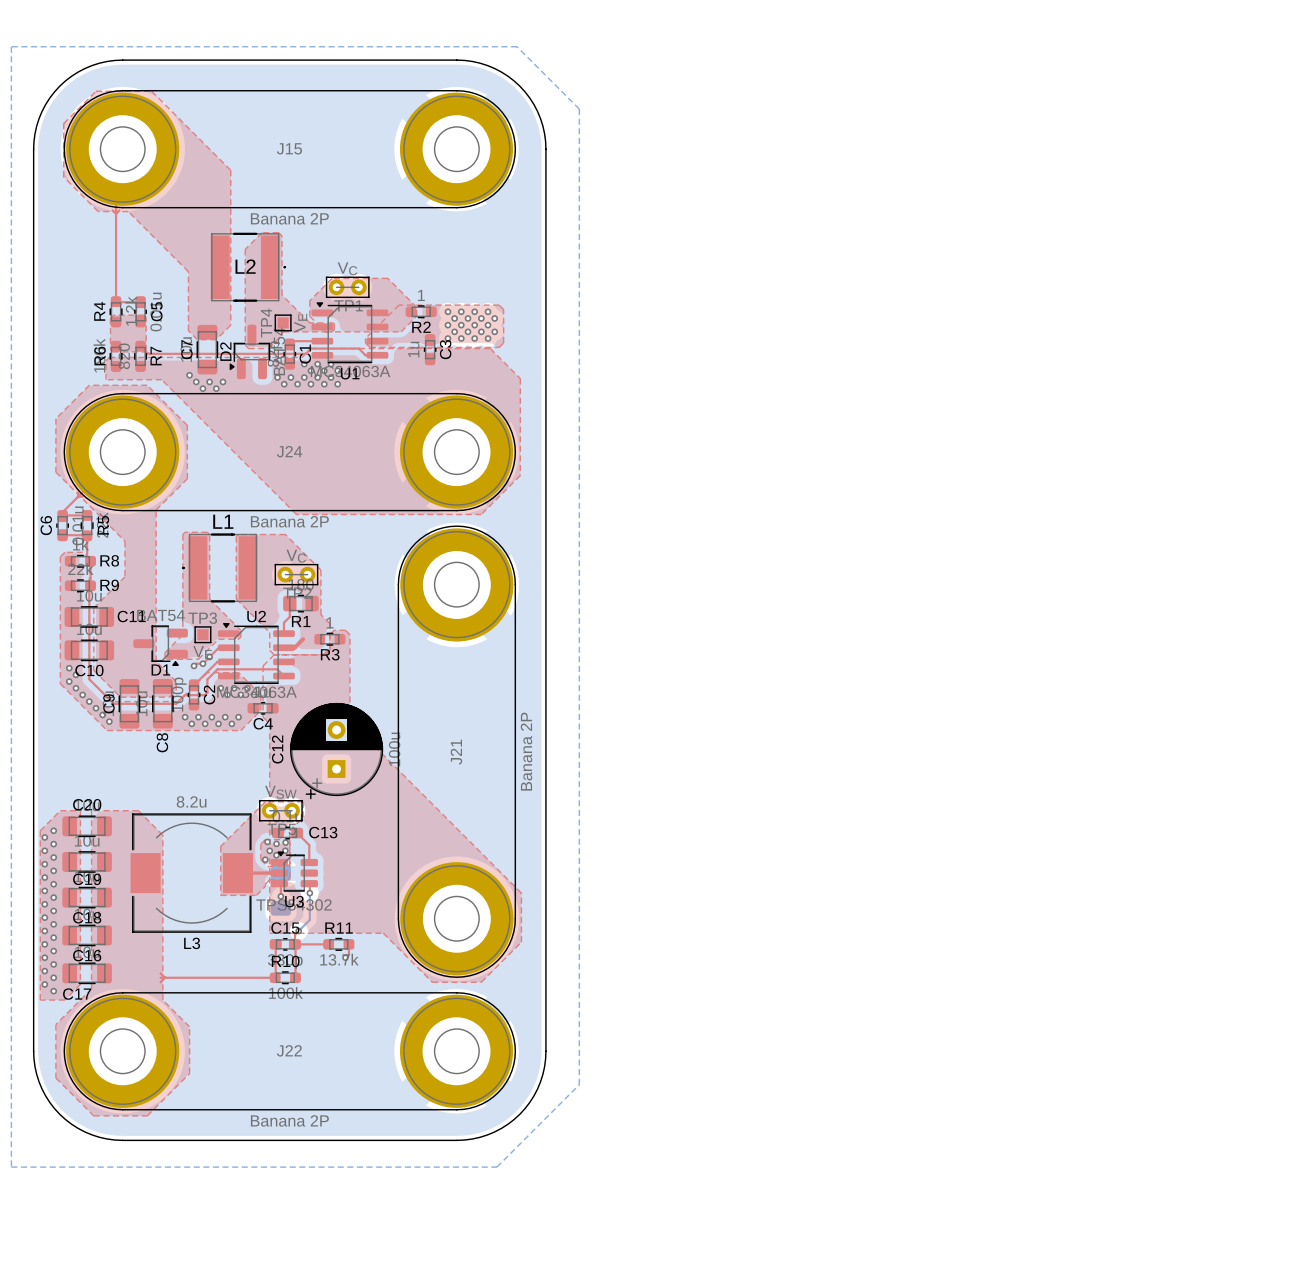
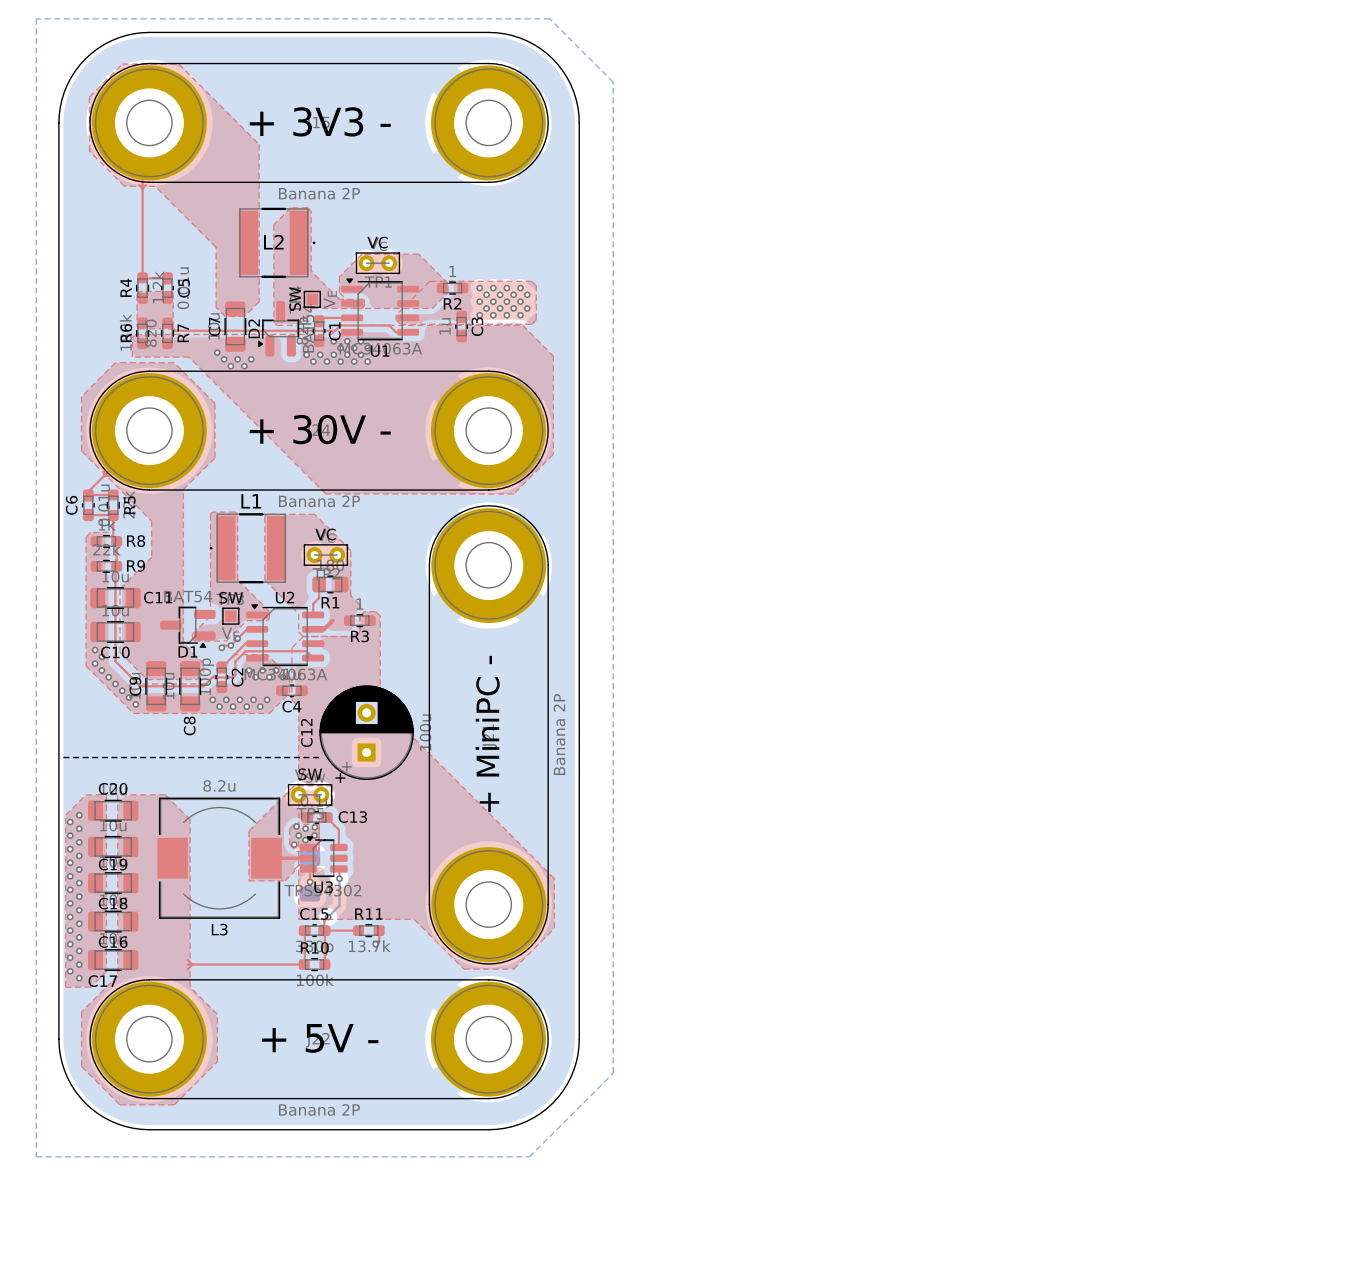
text: none -> + 3V3 - (320, 121)
text: none -> VC (377, 242)
text: none -> SW (295, 299)
text: none -> + 30V - (320, 429)
text: none -> VC (325, 534)
text: none -> SW (231, 597)
text: none -> + MiniPC - (487, 734)
line: none -> (63, 757) (319, 757)
text: none -> SW (310, 774)
text: none -> + 5V - (320, 1038)

